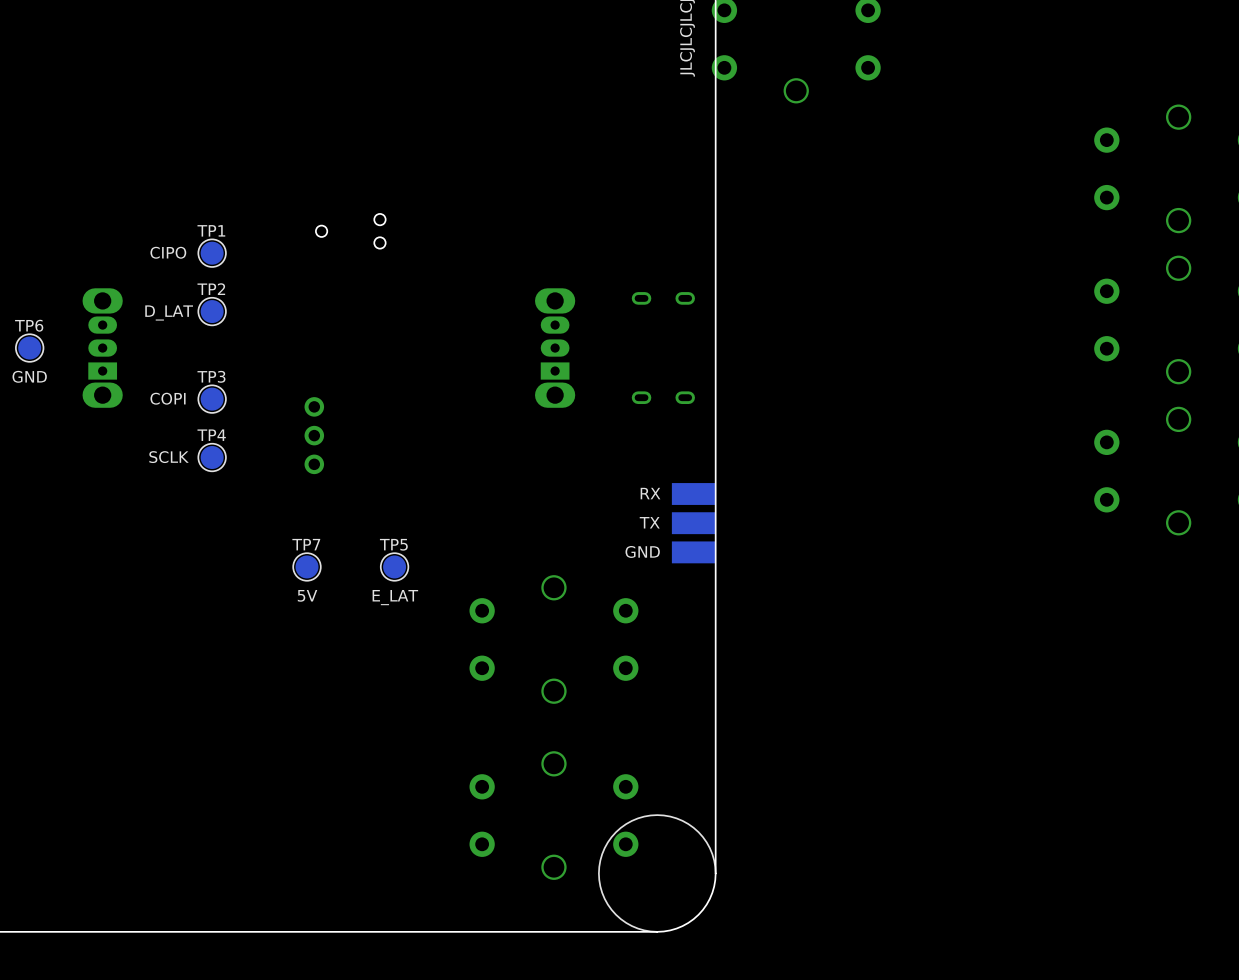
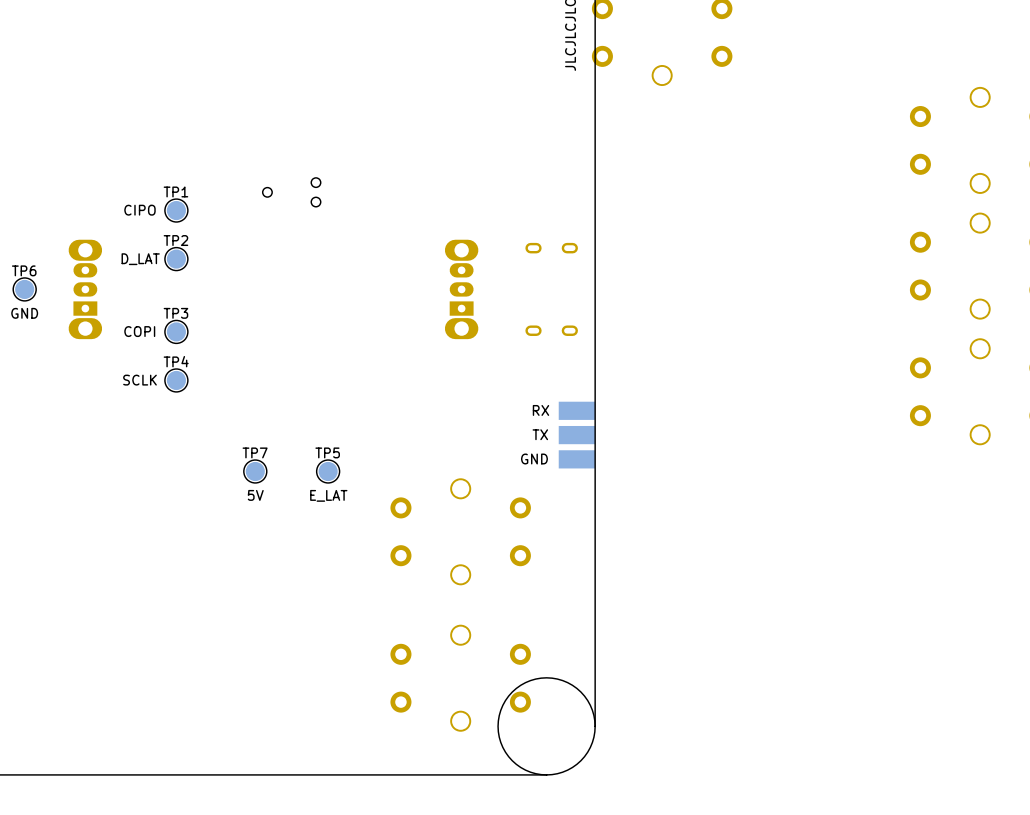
part: (314, 435) -> none

